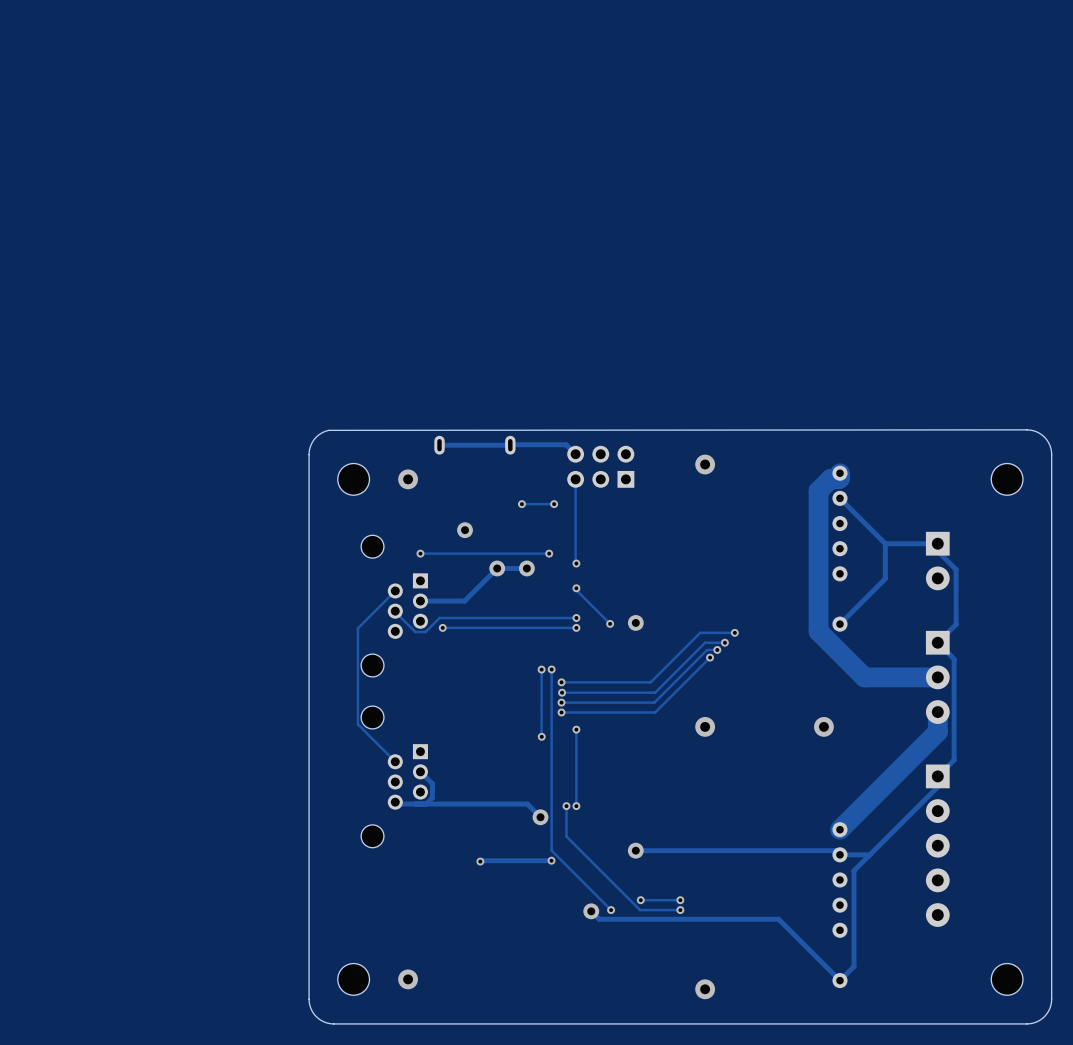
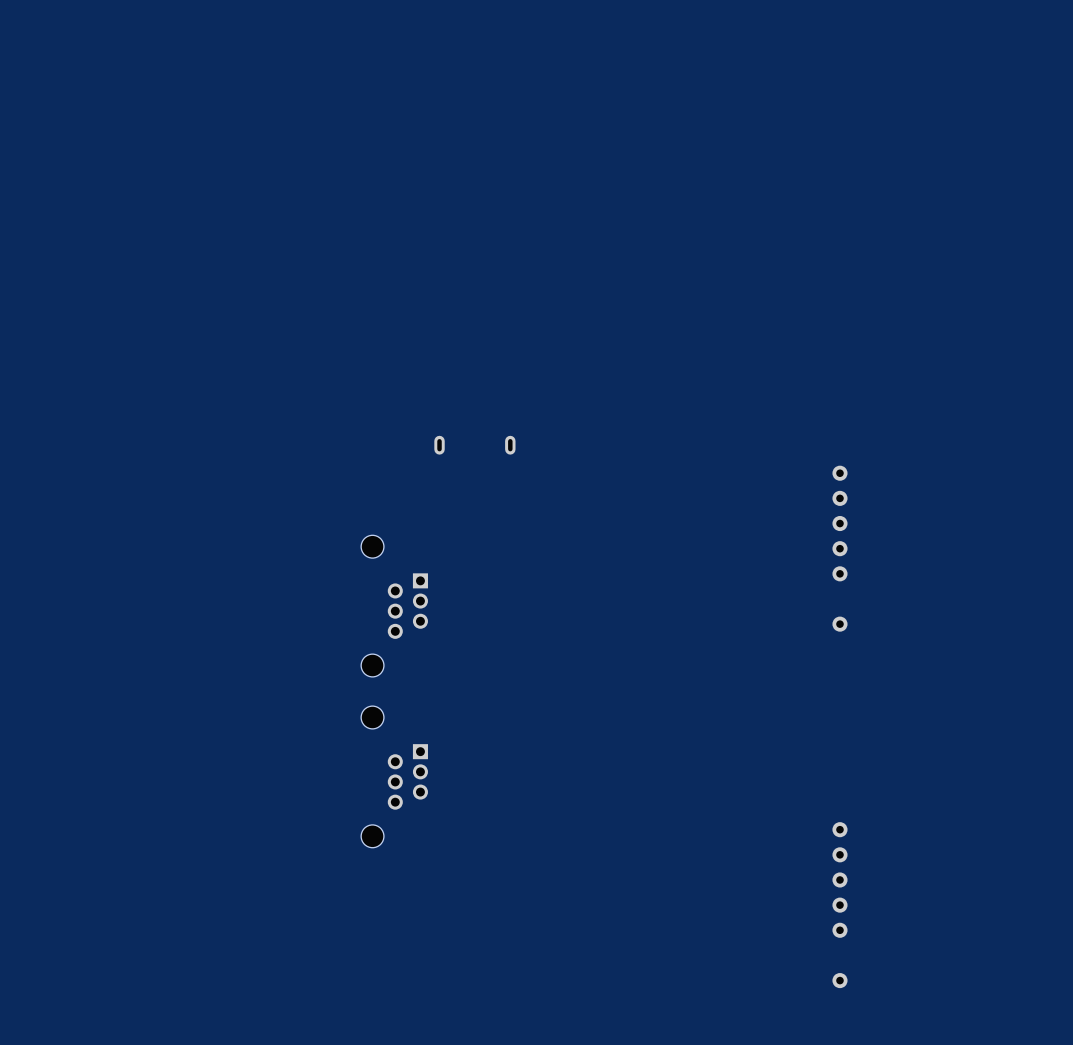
board edge: (1026, 429) (328, 430) (318, 434) (311, 443) (309, 454) (309, 999) (314, 1014) (321, 1020) (333, 1023) (1026, 1023) (1041, 1018) (1049, 1008) (1051, 999) (1051, 454) (1049, 445) (1044, 437) (1036, 431) (1026, 429) -> none
track: (439, 445) (566, 444) (575, 454) -> none
via: (705, 464) -> none
part: (600, 466) -> none
track: (839, 473) (839, 478) (830, 478) (818, 491) (818, 631) (864, 677) (937, 677) -> none
part: (353, 479) -> none
via: (408, 479) -> none
track: (575, 479) (576, 563) -> none
part: (1007, 479) -> none
track: (839, 498) (885, 543) -> none
via: (521, 504) -> none
track: (554, 504) (521, 504) -> none
via: (554, 504) -> none
via: (465, 530) -> none
track: (885, 543) (937, 543) (937, 551) (956, 569) (956, 624) (937, 642) (954, 659) (954, 760) (937, 776) (937, 786) (853, 870) (853, 966) (839, 980) (778, 919) (599, 919) (591, 911) -> none
track: (885, 543) (885, 578) (839, 624) -> none
via: (420, 553) -> none
track: (549, 553) (420, 553) -> none
via: (549, 553) -> none
part: (937, 561) -> none
via: (576, 563) -> none
via: (497, 568) -> none
track: (526, 568) (497, 568) (464, 601) (420, 601) -> none
via: (526, 568) -> none
track: (576, 588) (610, 623) -> none
via: (576, 588) -> none
track: (395, 590) (357, 628) (357, 724) (395, 761) -> none
track: (395, 611) (415, 632) (425, 632) (439, 617) (576, 617) -> none
via: (576, 617) -> none
via: (635, 622) -> none
via: (610, 623) -> none
via: (442, 627) -> none
track: (576, 627) (442, 627) -> none
via: (576, 627) -> none
track: (734, 632) (700, 632) (650, 682) (561, 682) -> none
via: (734, 632) -> none
track: (724, 642) (705, 642) (655, 692) (562, 692) -> none
via: (724, 642) -> none
track: (717, 649) (707, 649) (654, 702) (561, 702) -> none
via: (717, 649) -> none
track: (710, 657) (655, 712) (561, 712) -> none
via: (710, 657) -> none
track: (541, 669) (541, 736) -> none
via: (541, 669) -> none
track: (551, 669) (551, 850) (611, 910) -> none
via: (551, 669) -> none
part: (937, 677) -> none
via: (561, 682) -> none
via: (562, 692) -> none
via: (561, 702) -> none
via: (561, 712) -> none
track: (937, 712) (937, 731) (839, 829) -> none
via: (705, 726) -> none
via: (823, 726) -> none
track: (576, 729) (576, 806) -> none
via: (576, 729) -> none
via: (541, 736) -> none
track: (420, 771) (432, 783) (432, 797) (426, 804) -> none
track: (395, 802) (397, 804) (527, 804) (540, 817) -> none
track: (566, 806) (566, 836) (640, 910) (680, 910) -> none
via: (566, 806) -> none
via: (576, 806) -> none
via: (540, 817) -> none
part: (937, 845) -> none
track: (635, 850) (835, 850) (839, 854) (869, 854) -> none
via: (635, 850) -> none
track: (551, 860) (480, 861) -> none
via: (551, 860) -> none
via: (480, 861) -> none
via: (640, 900) -> none
track: (680, 900) (640, 900) -> none
via: (680, 900) -> none
via: (611, 910) -> none
via: (680, 910) -> none
via: (591, 911) -> none
part: (353, 979) -> none
via: (408, 979) -> none
part: (1007, 979) -> none
via: (705, 989) -> none

